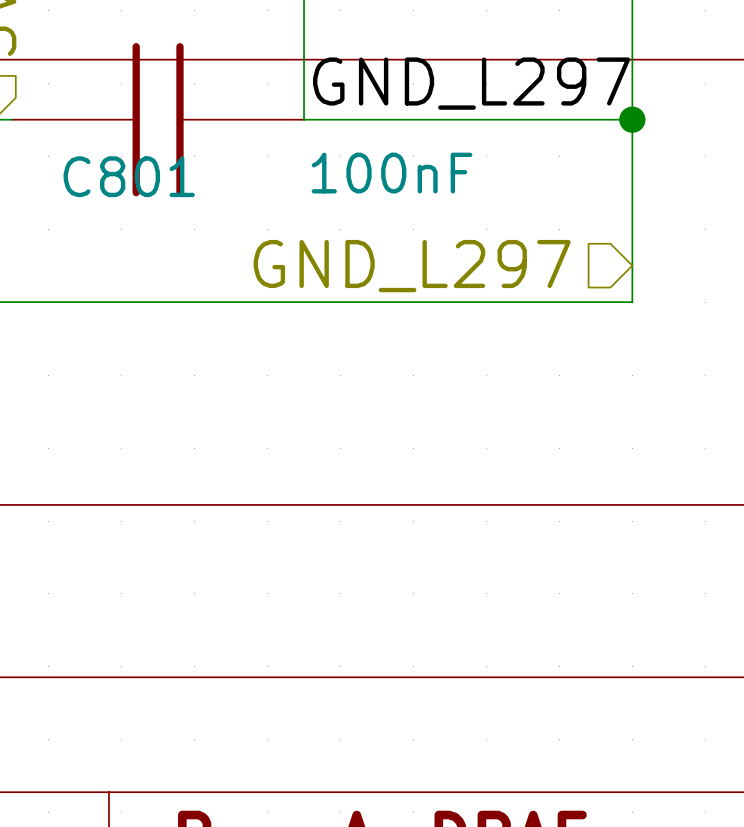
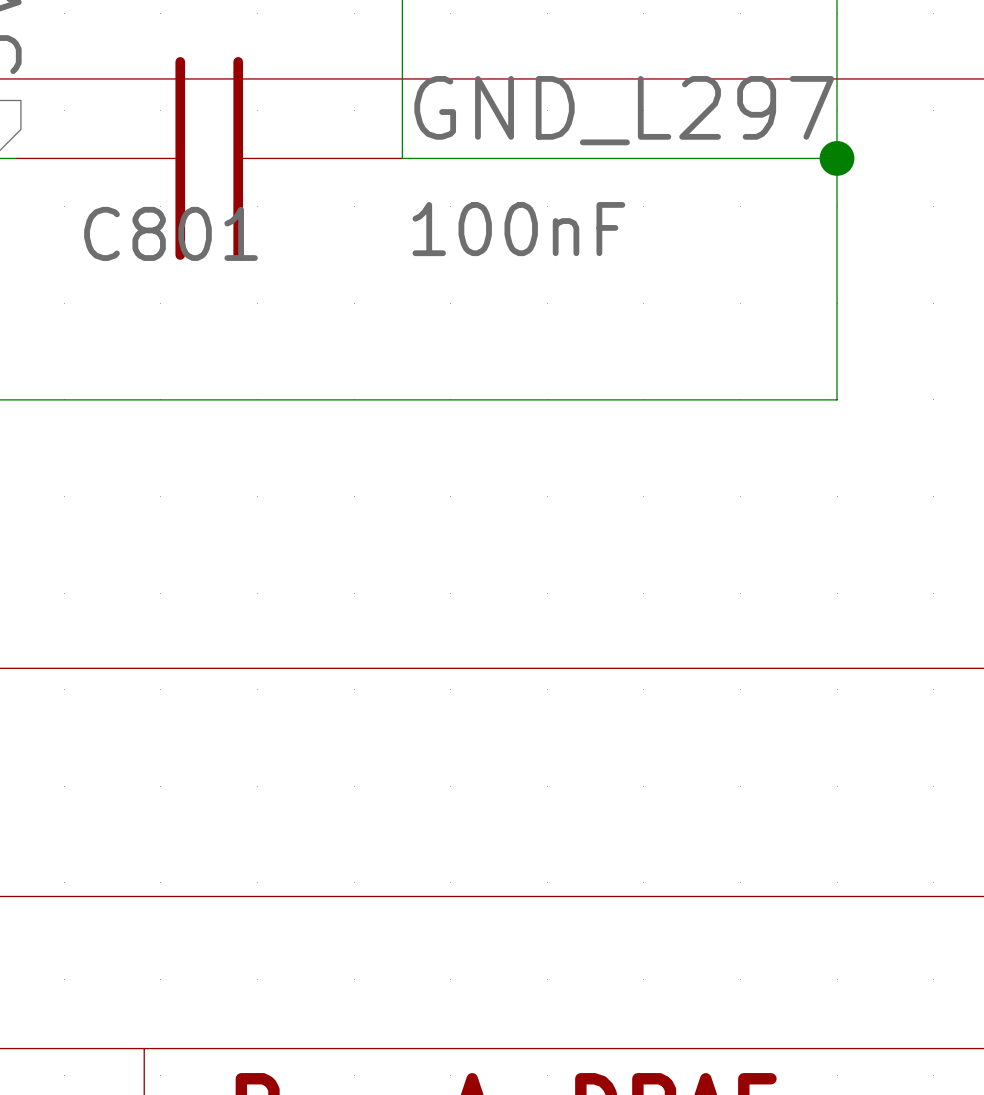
hierarchical label: GND_L297 (412, 266) -> none

